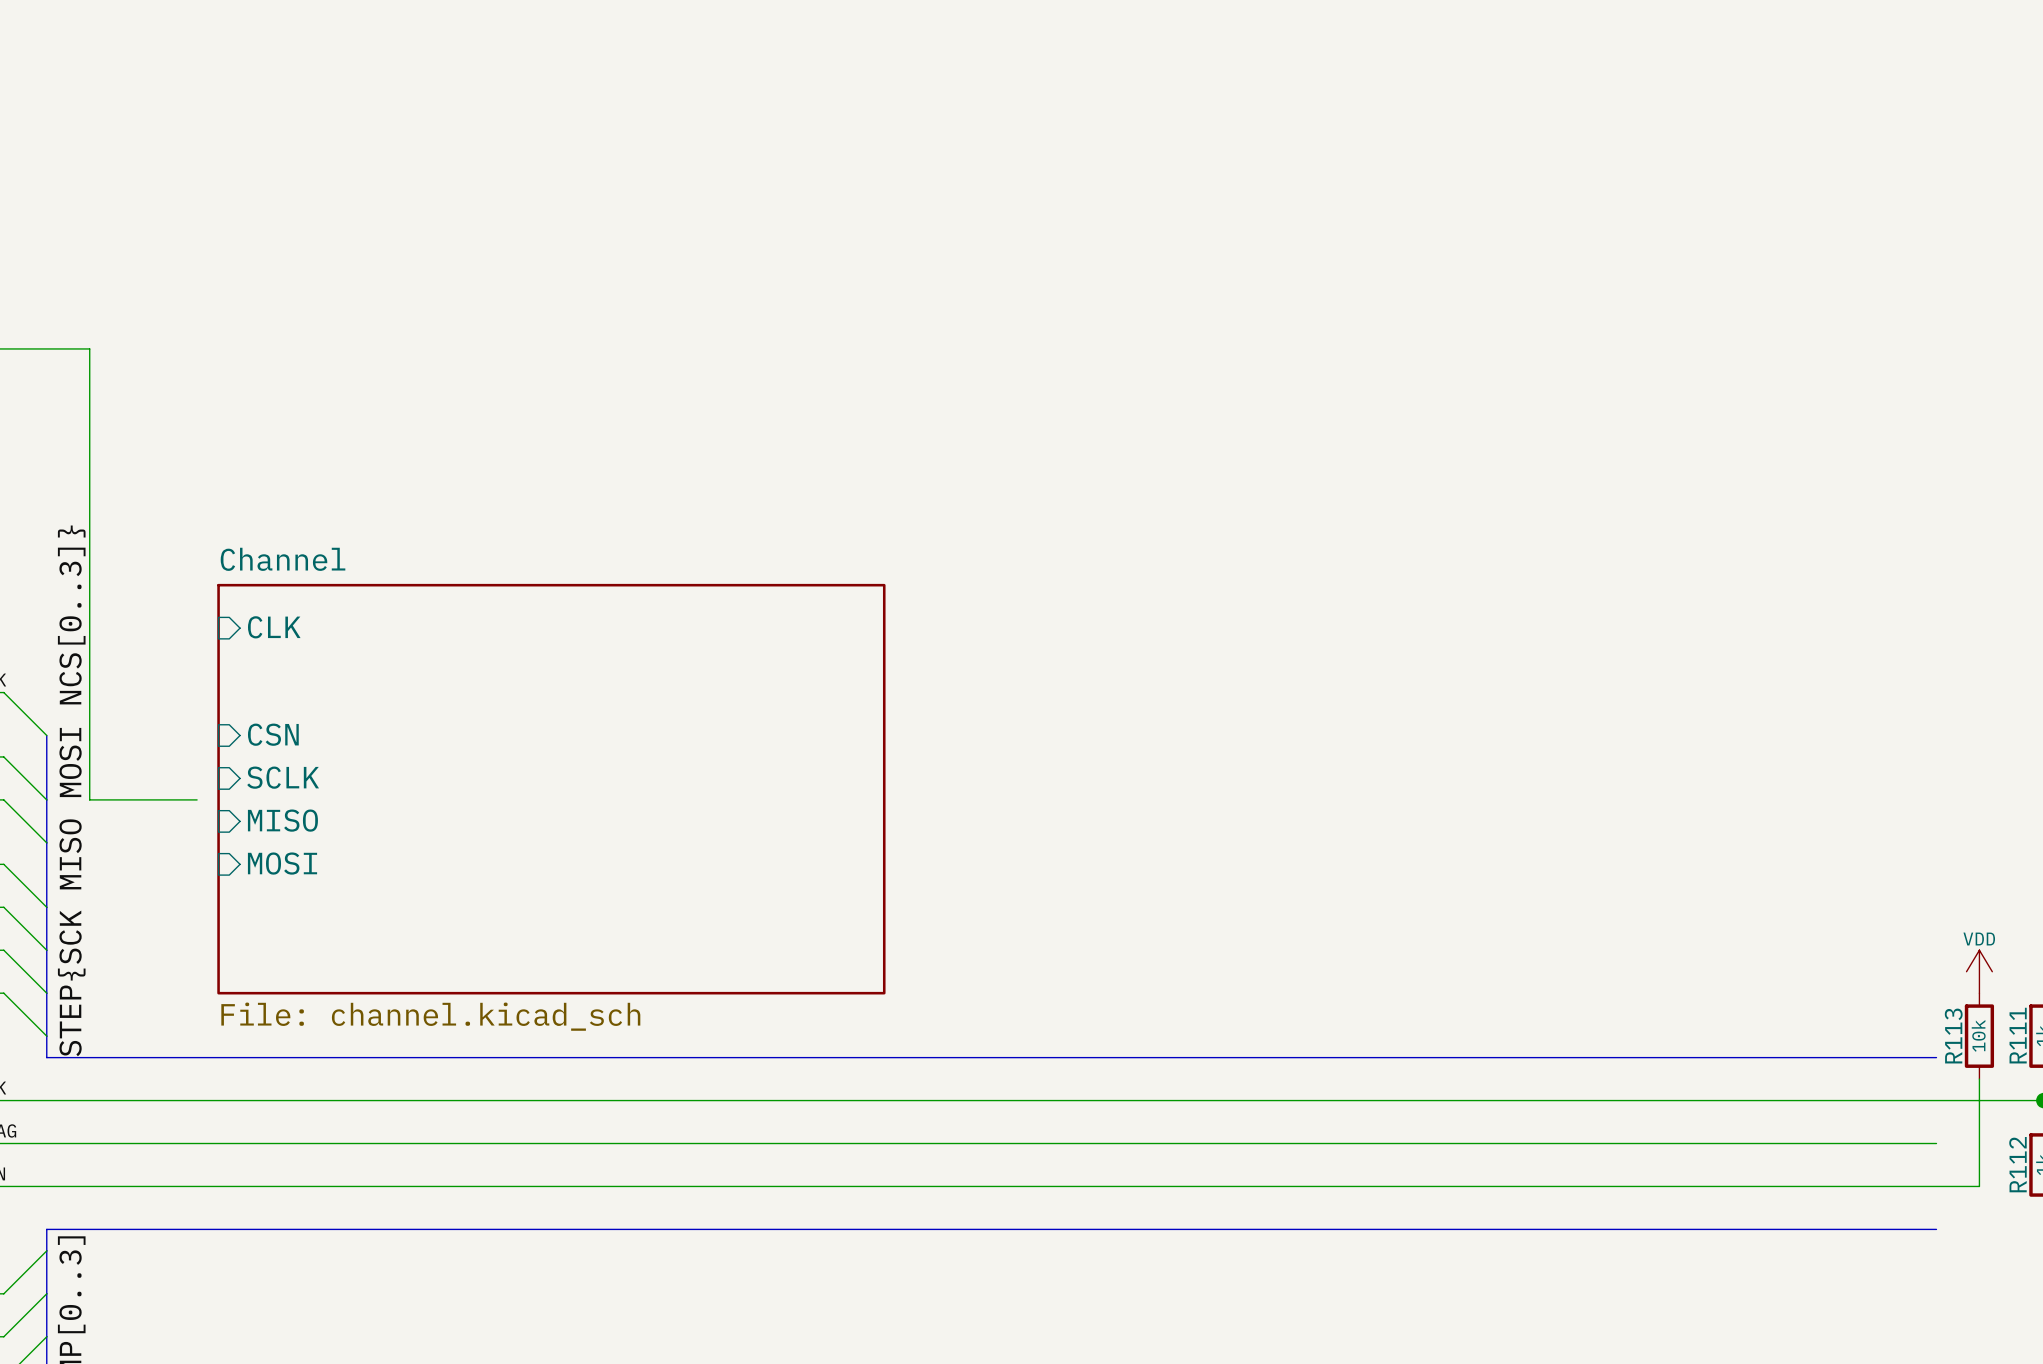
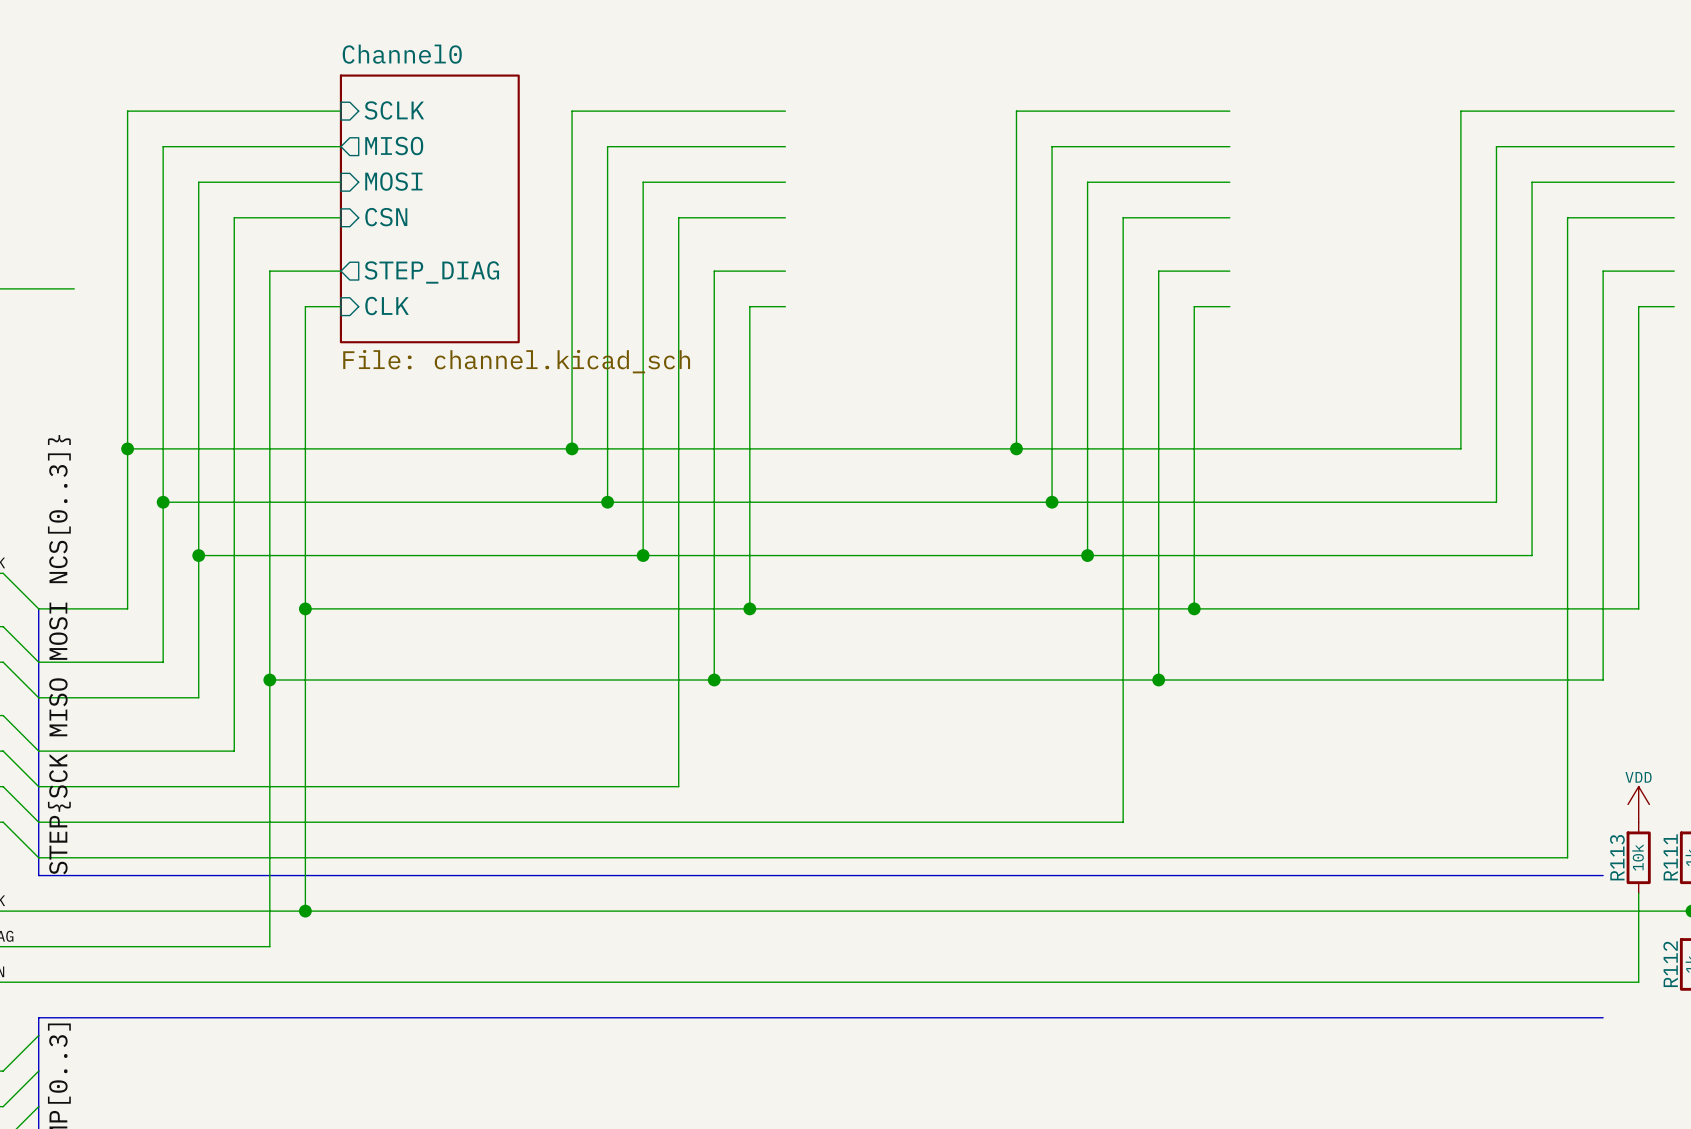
sheet pin: none -> SCLK (394, 110)
wire: none -> (340, 111) (127, 111) (127, 608) (38, 608)
wire: none -> (785, 111) (572, 111) (572, 448)
wire: none -> (1229, 111) (1016, 111) (1016, 448)
wire: none -> (1674, 111) (1460, 111) (1460, 448) (127, 448)
sheet pin: none -> MISO (394, 146)
wire: none -> (340, 146) (163, 146) (163, 662)
wire: none -> (785, 146) (607, 146) (607, 502)
wire: none -> (1229, 146) (1052, 146) (1052, 502)
wire: none -> (1674, 146) (1496, 146) (1496, 502) (163, 502)
sheet pin: none -> MOSI (393, 181)
wire: none -> (340, 182) (198, 182) (198, 697) (38, 697)
wire: none -> (785, 182) (643, 182) (643, 555)
wire: none -> (1229, 182) (1087, 182) (1087, 555)
wire: none -> (1674, 182) (1532, 182) (1532, 555) (198, 555)
sheet Channel0: none -> File: channel.kicad_sch (429, 208)
sheet pin: none -> CSN (386, 217)
wire: none -> (340, 217) (234, 217) (234, 751) (38, 751)
wire: none -> (785, 217) (678, 217) (678, 786) (38, 786)
wire: none -> (1229, 217) (1123, 217) (1123, 822) (38, 822)
wire: none -> (1674, 217) (1567, 217) (1567, 857) (38, 857)
wire: none -> (785, 271) (714, 271) (714, 680)
wire: none -> (1229, 271) (1158, 271) (1158, 680)
wire: none -> (1674, 271) (1603, 271) (1603, 680) (269, 680)
sheet pin: none -> STEP_DIAG (431, 272)
wire: (89, 348) (89, 799) -> (38, 662) (74, 662)
wire: none -> (340, 306) (305, 306) (305, 911)
wire: none -> (785, 306) (749, 306) (749, 608)
wire: none -> (1229, 306) (1194, 306) (1194, 608)
wire: none -> (1674, 306) (1638, 306) (1638, 608) (305, 608)
junction: none -> (127, 448)
junction: none -> (572, 448)
junction: none -> (1016, 448)
junction: none -> (163, 502)
junction: none -> (607, 502)
junction: none -> (1052, 502)
sheet pin position: CLK (274, 627) -> CLK (387, 306)
junction: none -> (198, 555)
junction: none -> (643, 555)
junction: none -> (1087, 555)
sheet pin: CSN (273, 734) -> none
junction: none -> (305, 608)
junction: none -> (749, 608)
junction: none -> (1194, 608)
sheet pin: SCLK (283, 777) -> none
sheet Channel: File: channel.kicad_sch (551, 789) -> none
sheet pin: MISO (282, 820) -> none
junction: none -> (269, 680)
junction: none -> (714, 680)
junction: none -> (1158, 680)
sheet pin: MOSI (282, 863) -> none
junction: none -> (305, 911)
wire: (325, 1143) (1936, 1143) -> (269, 946) (269, 271) (340, 271)

